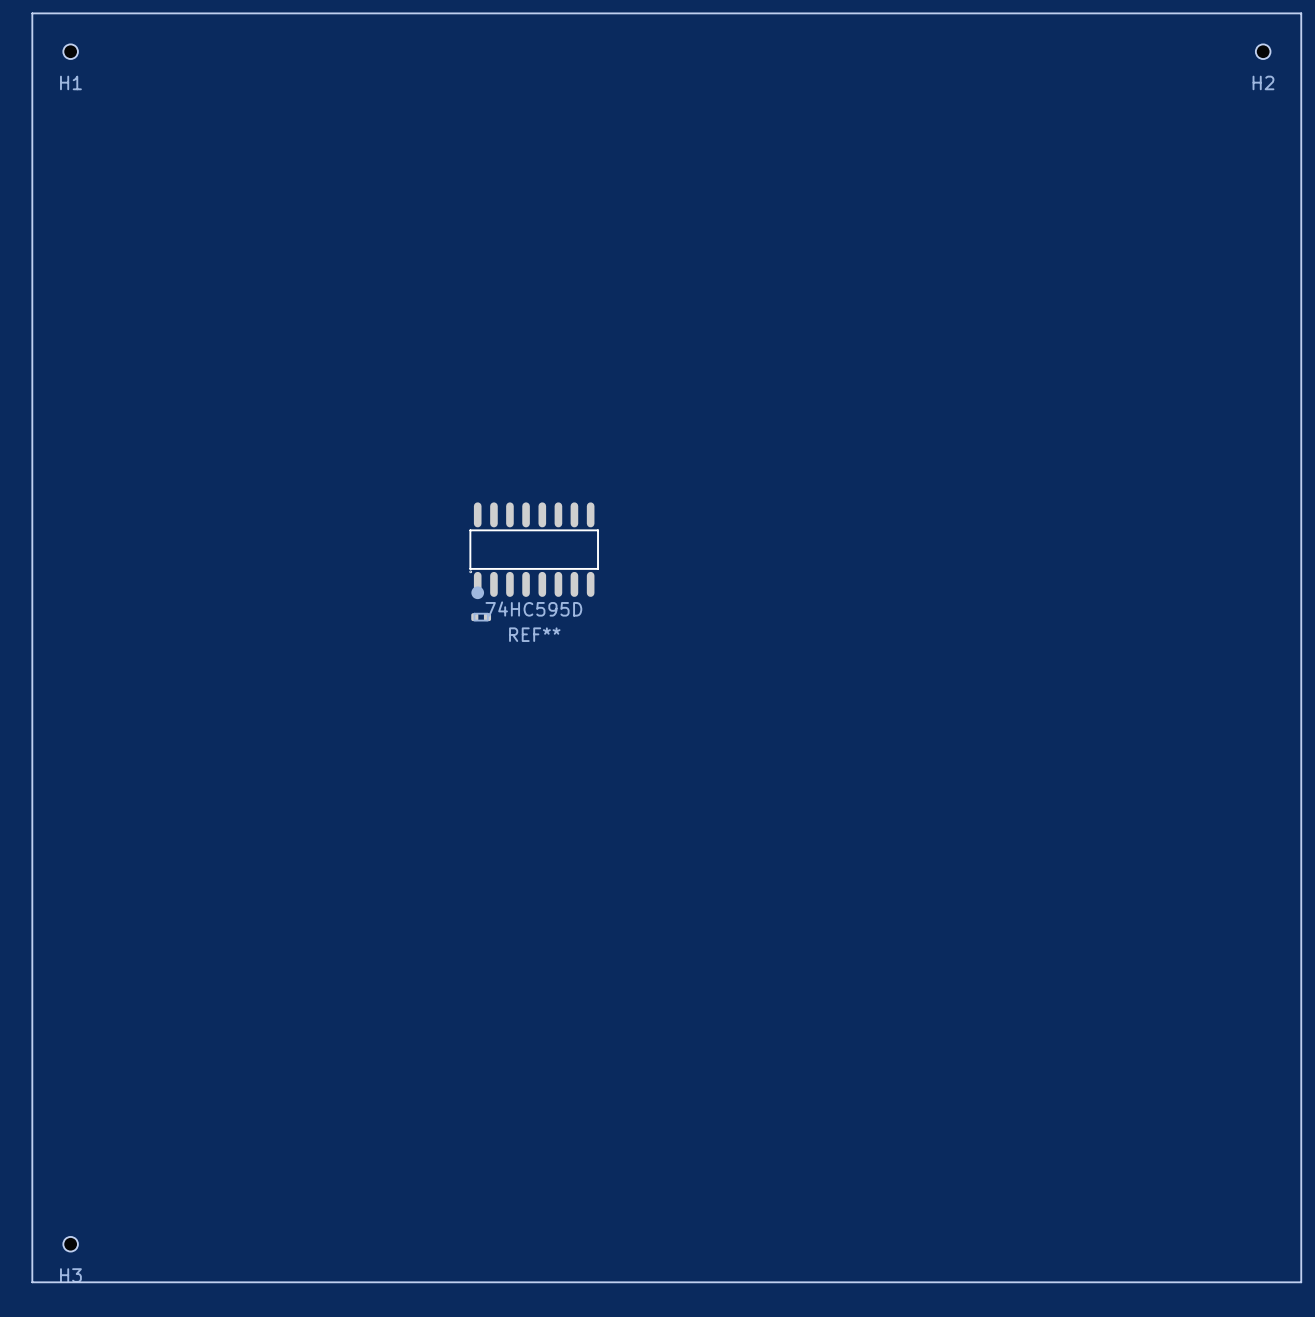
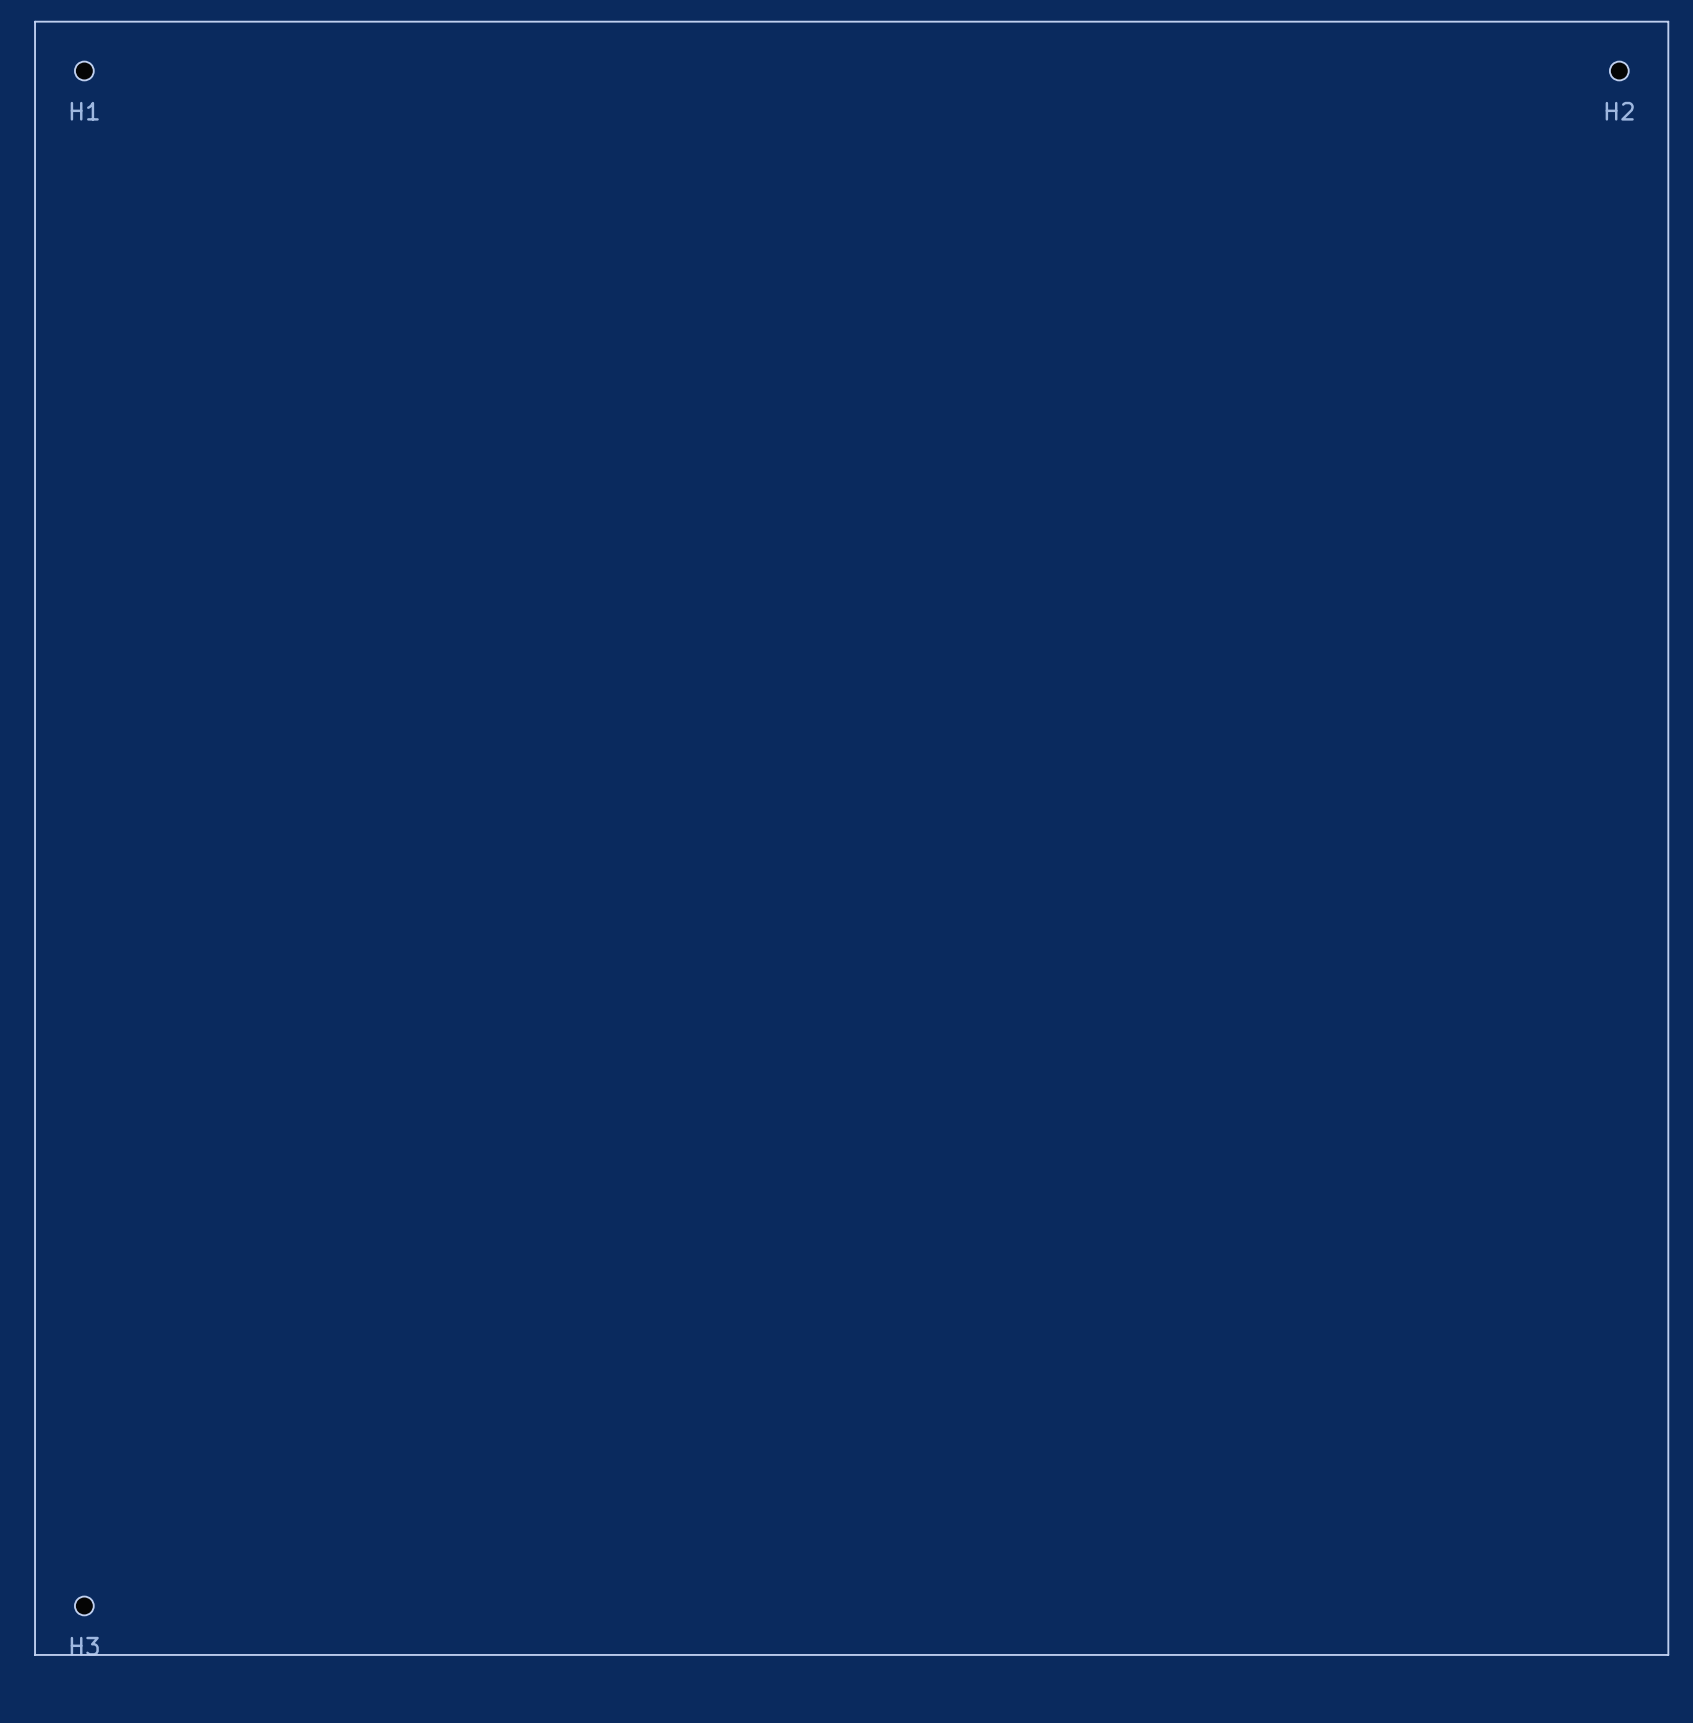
part: 74HC595D (534, 550) -> none
part: (481, 617) -> none

